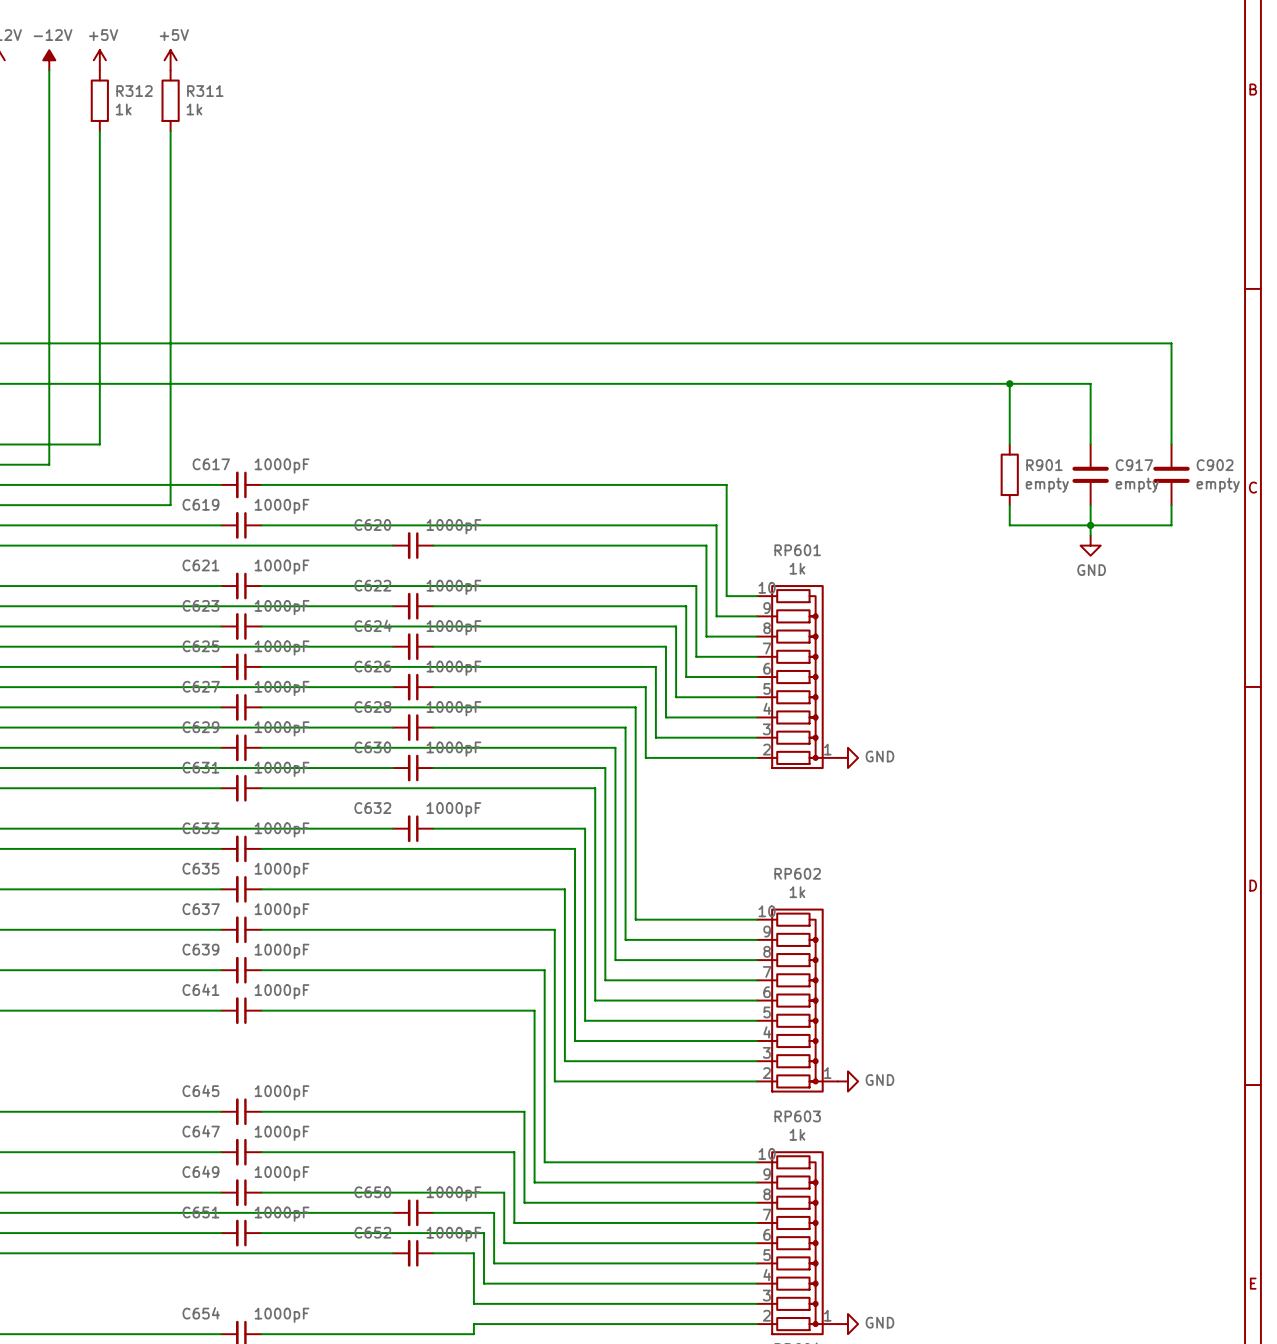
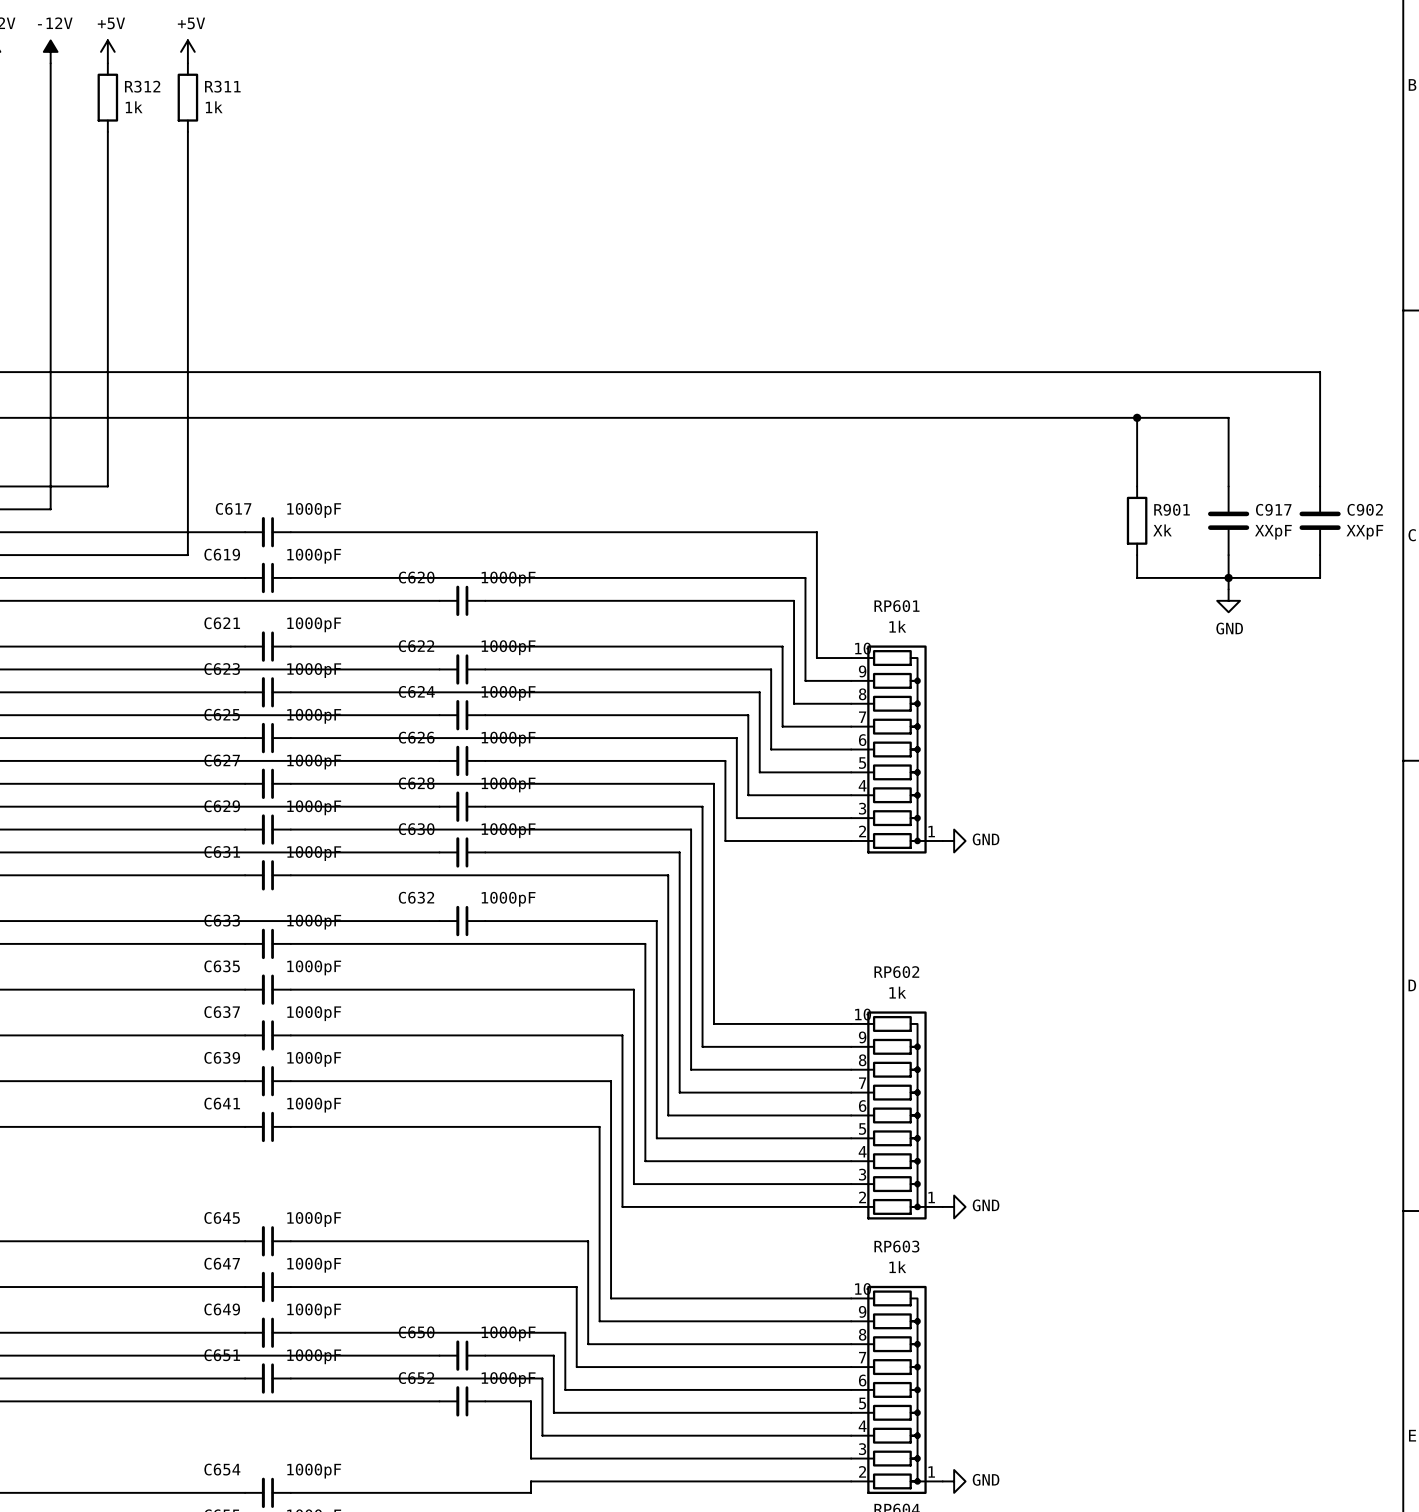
R901 value: empty (1047, 485) -> Xk (1162, 530)
C917 value: empty (1137, 485) -> XXpF (1273, 532)
C902 value: empty (1218, 485) -> XXpF (1364, 532)

